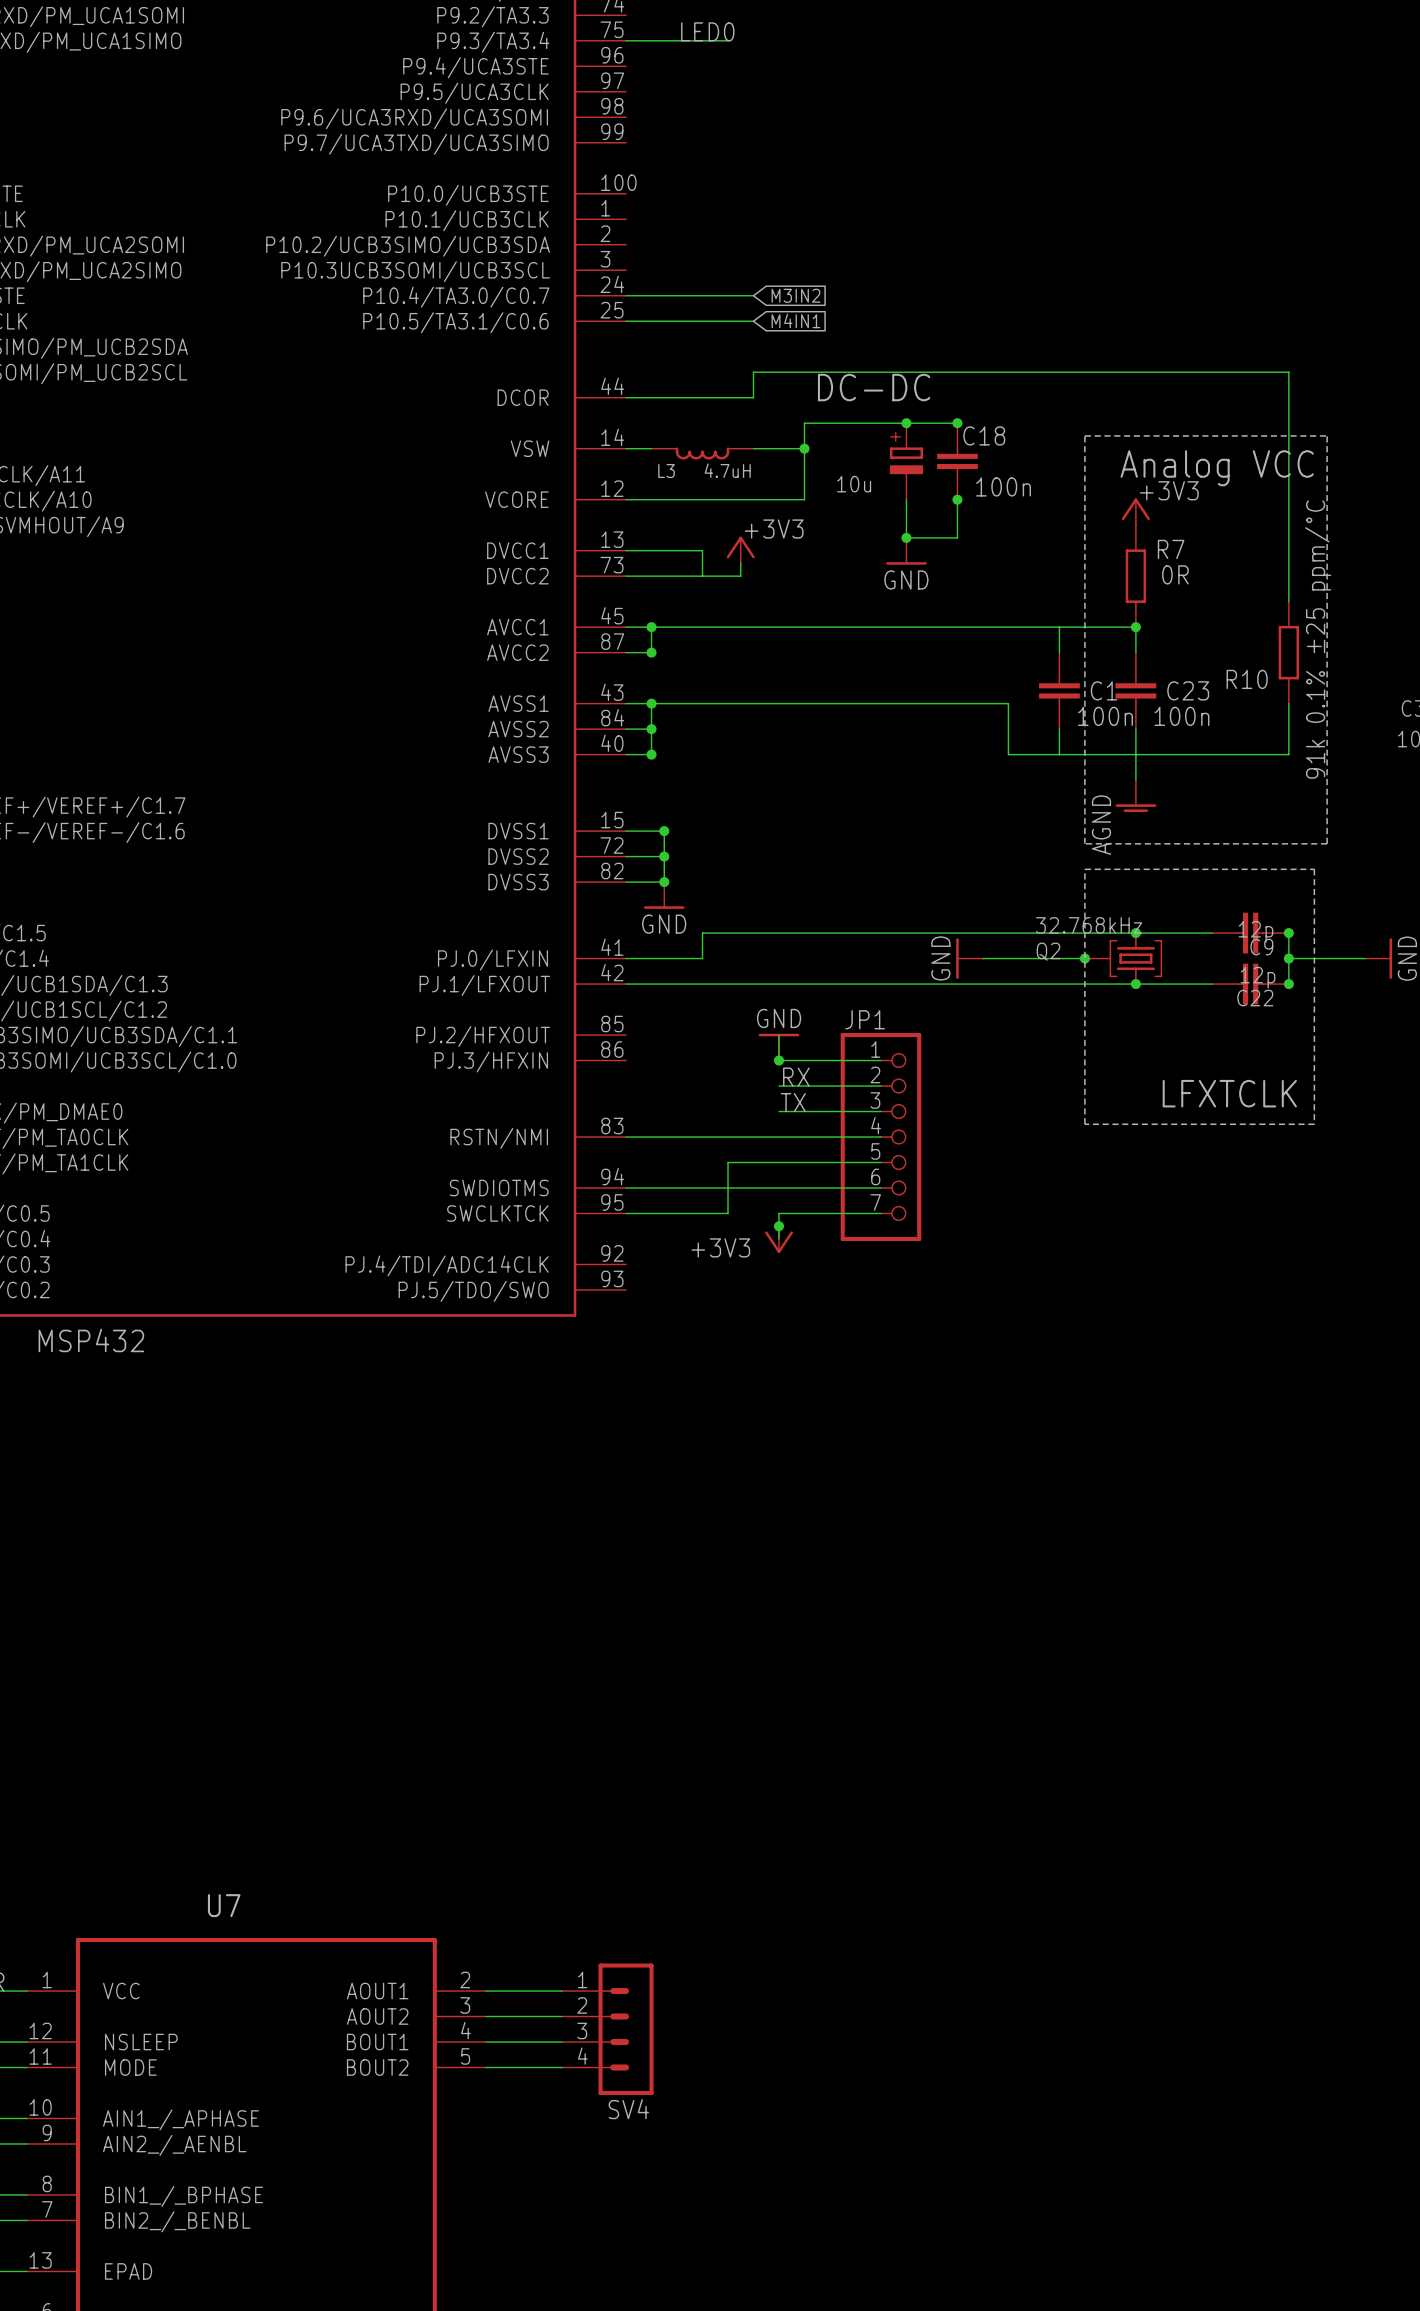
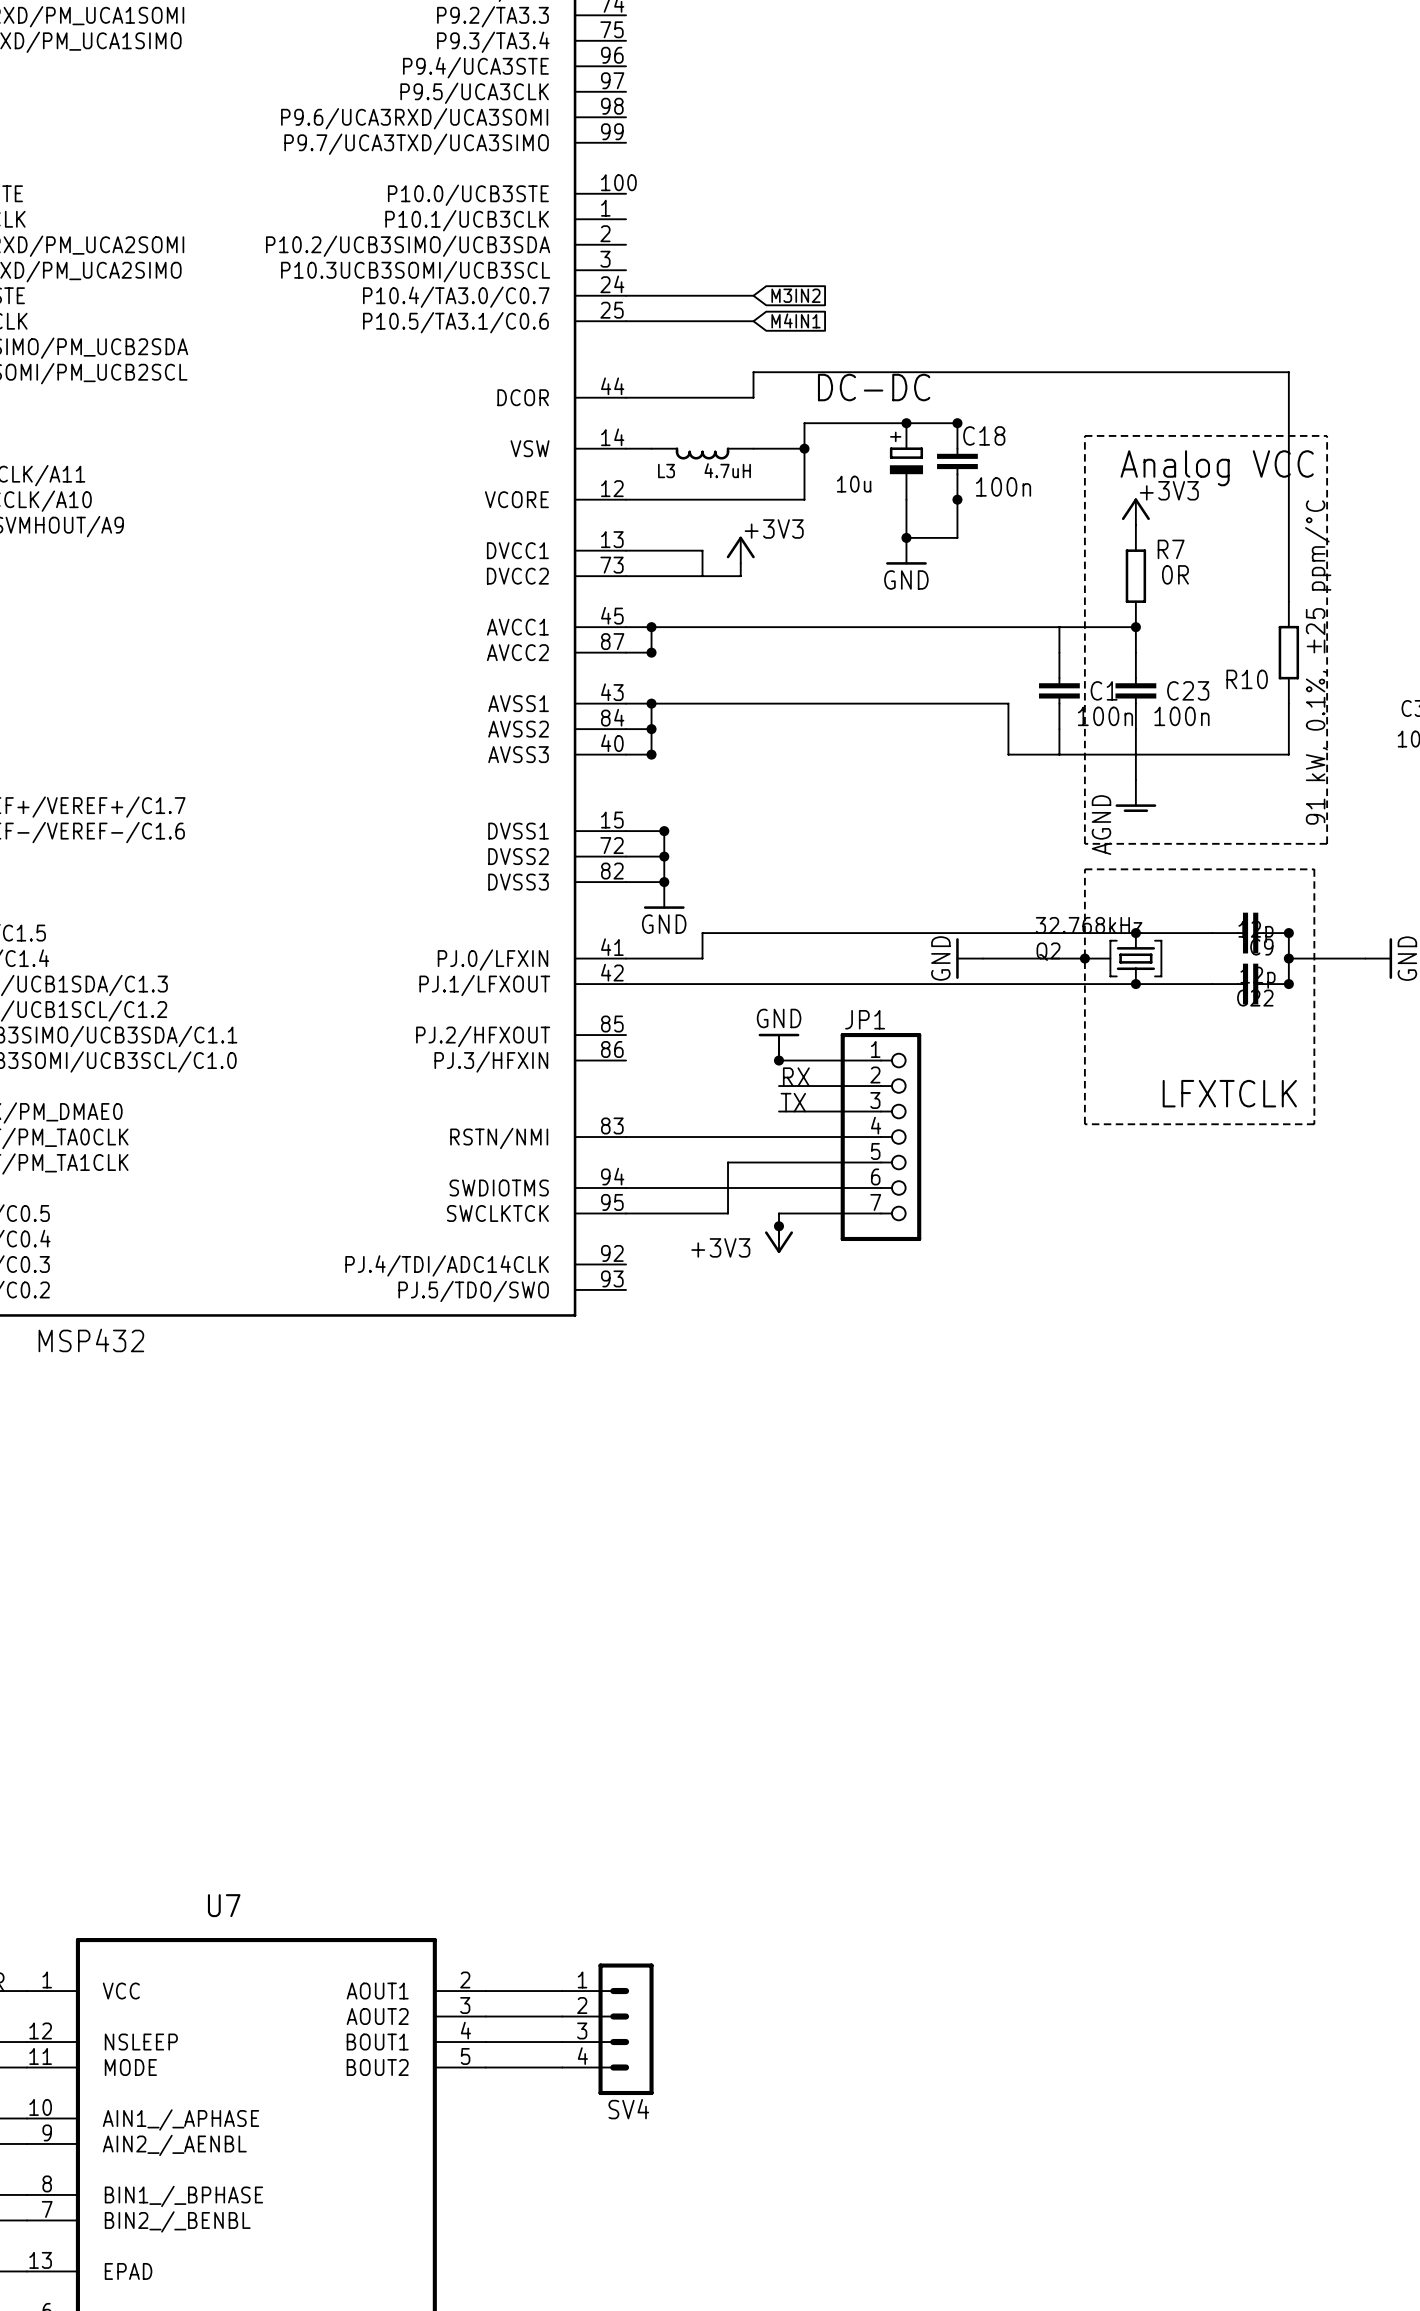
label: LED0 (707, 31) -> none
wire: (626, 40) (728, 40) -> none
R10 value: 91k 0.1% ±25 ppm/°C (1318, 639) -> 91 kW, 0.1%, ±25 ppm/°C (1318, 662)

